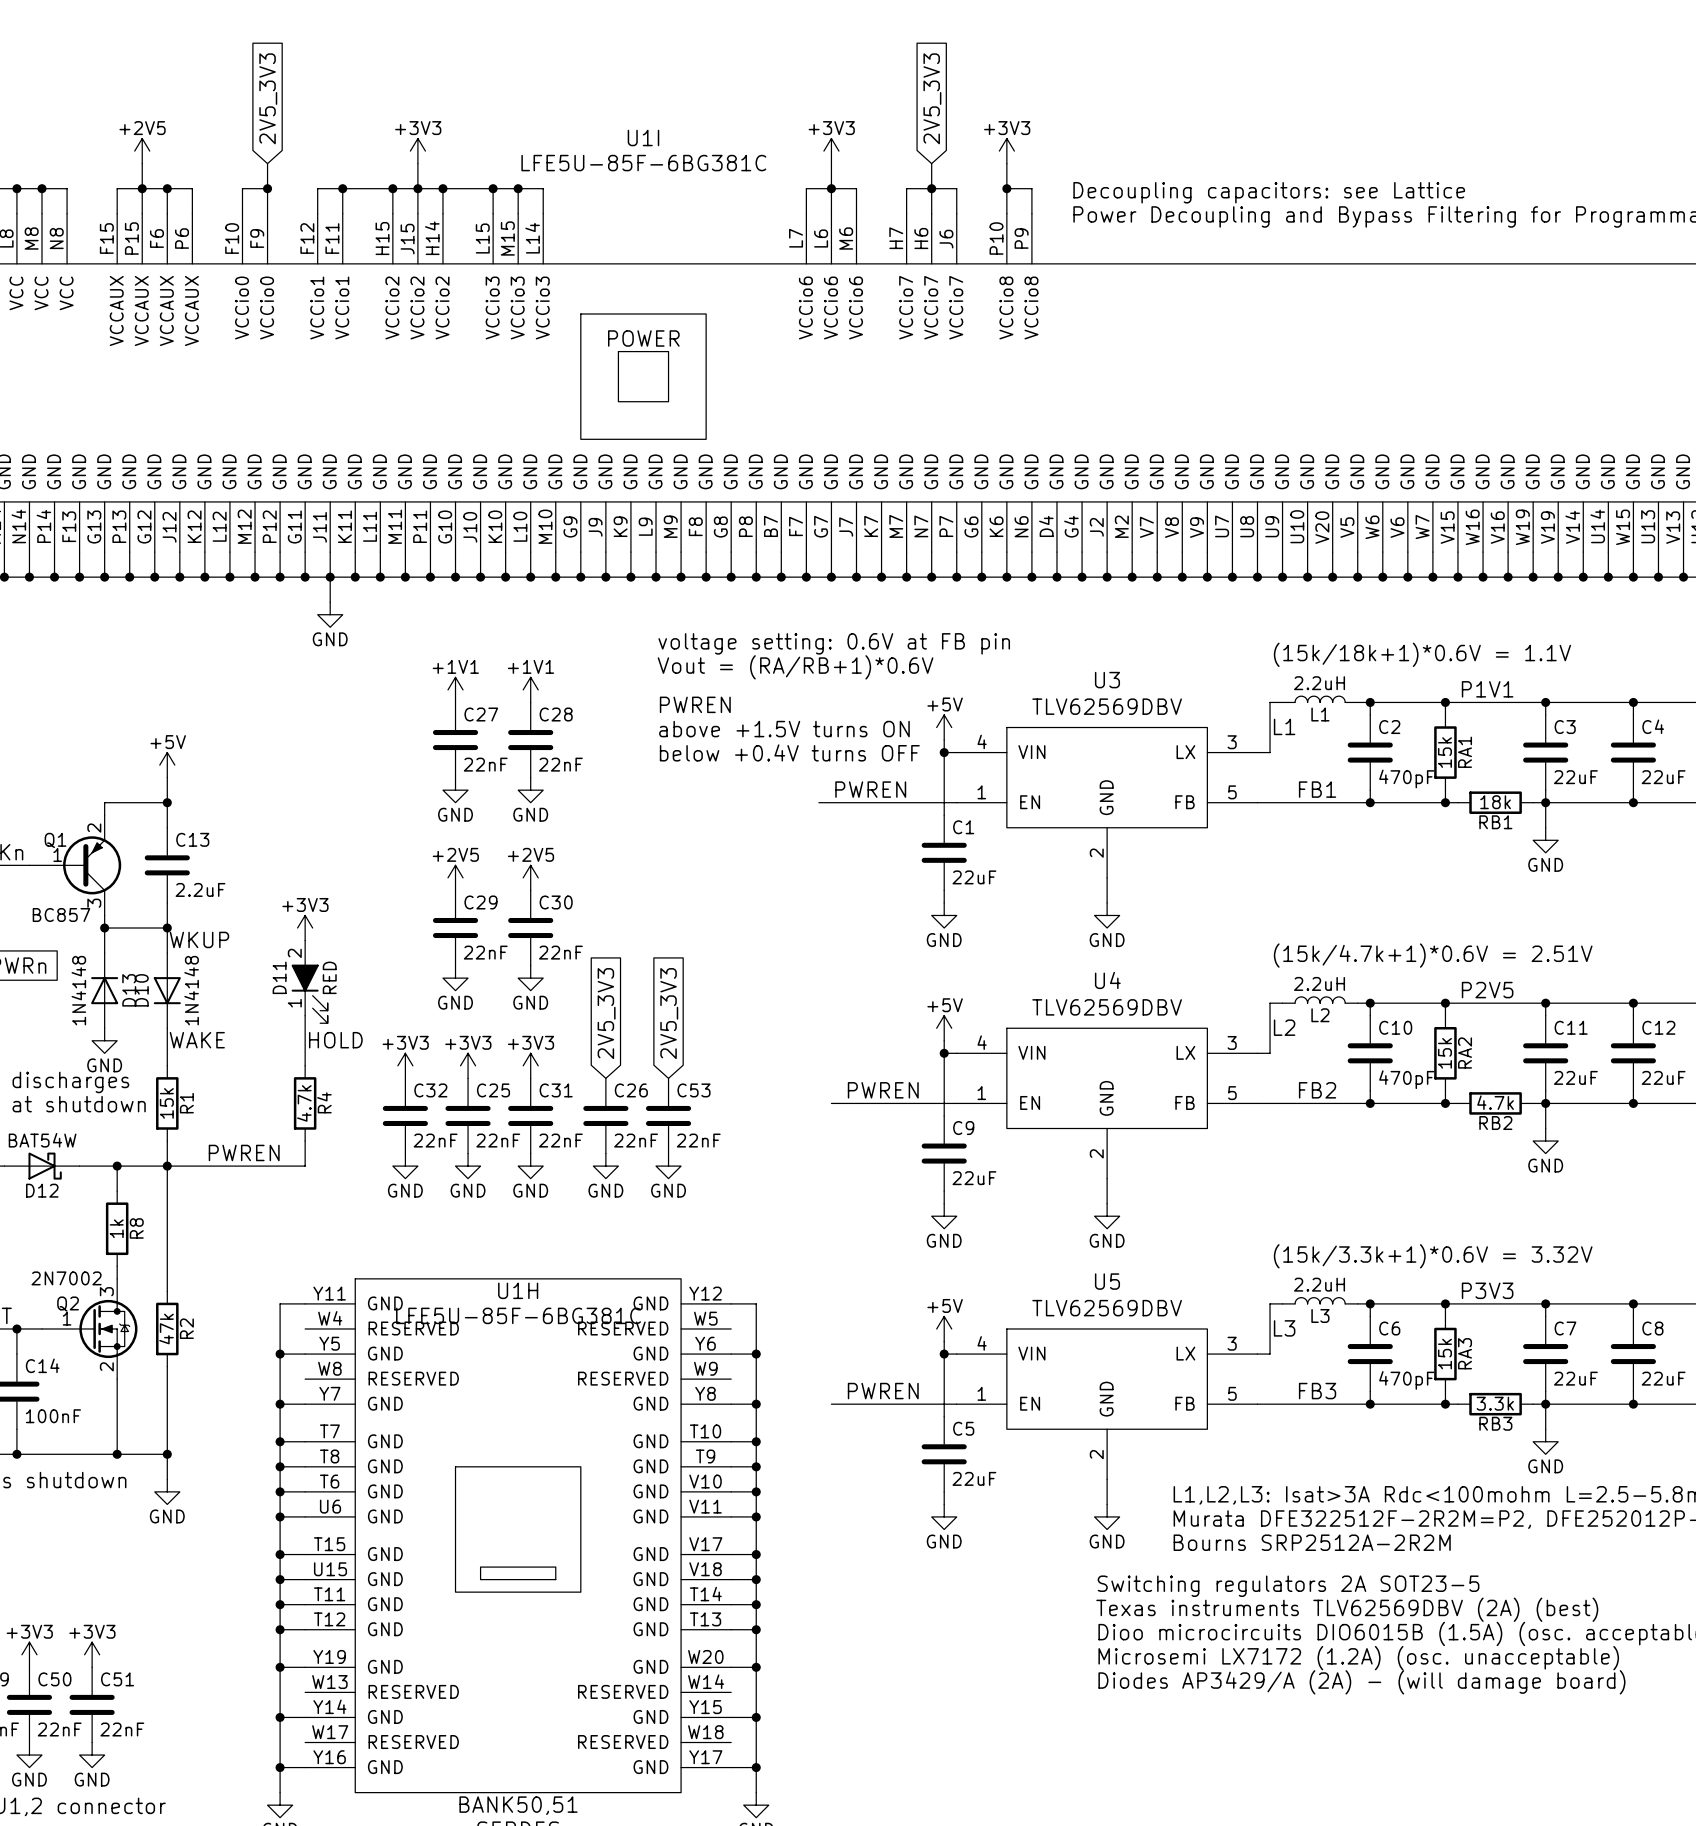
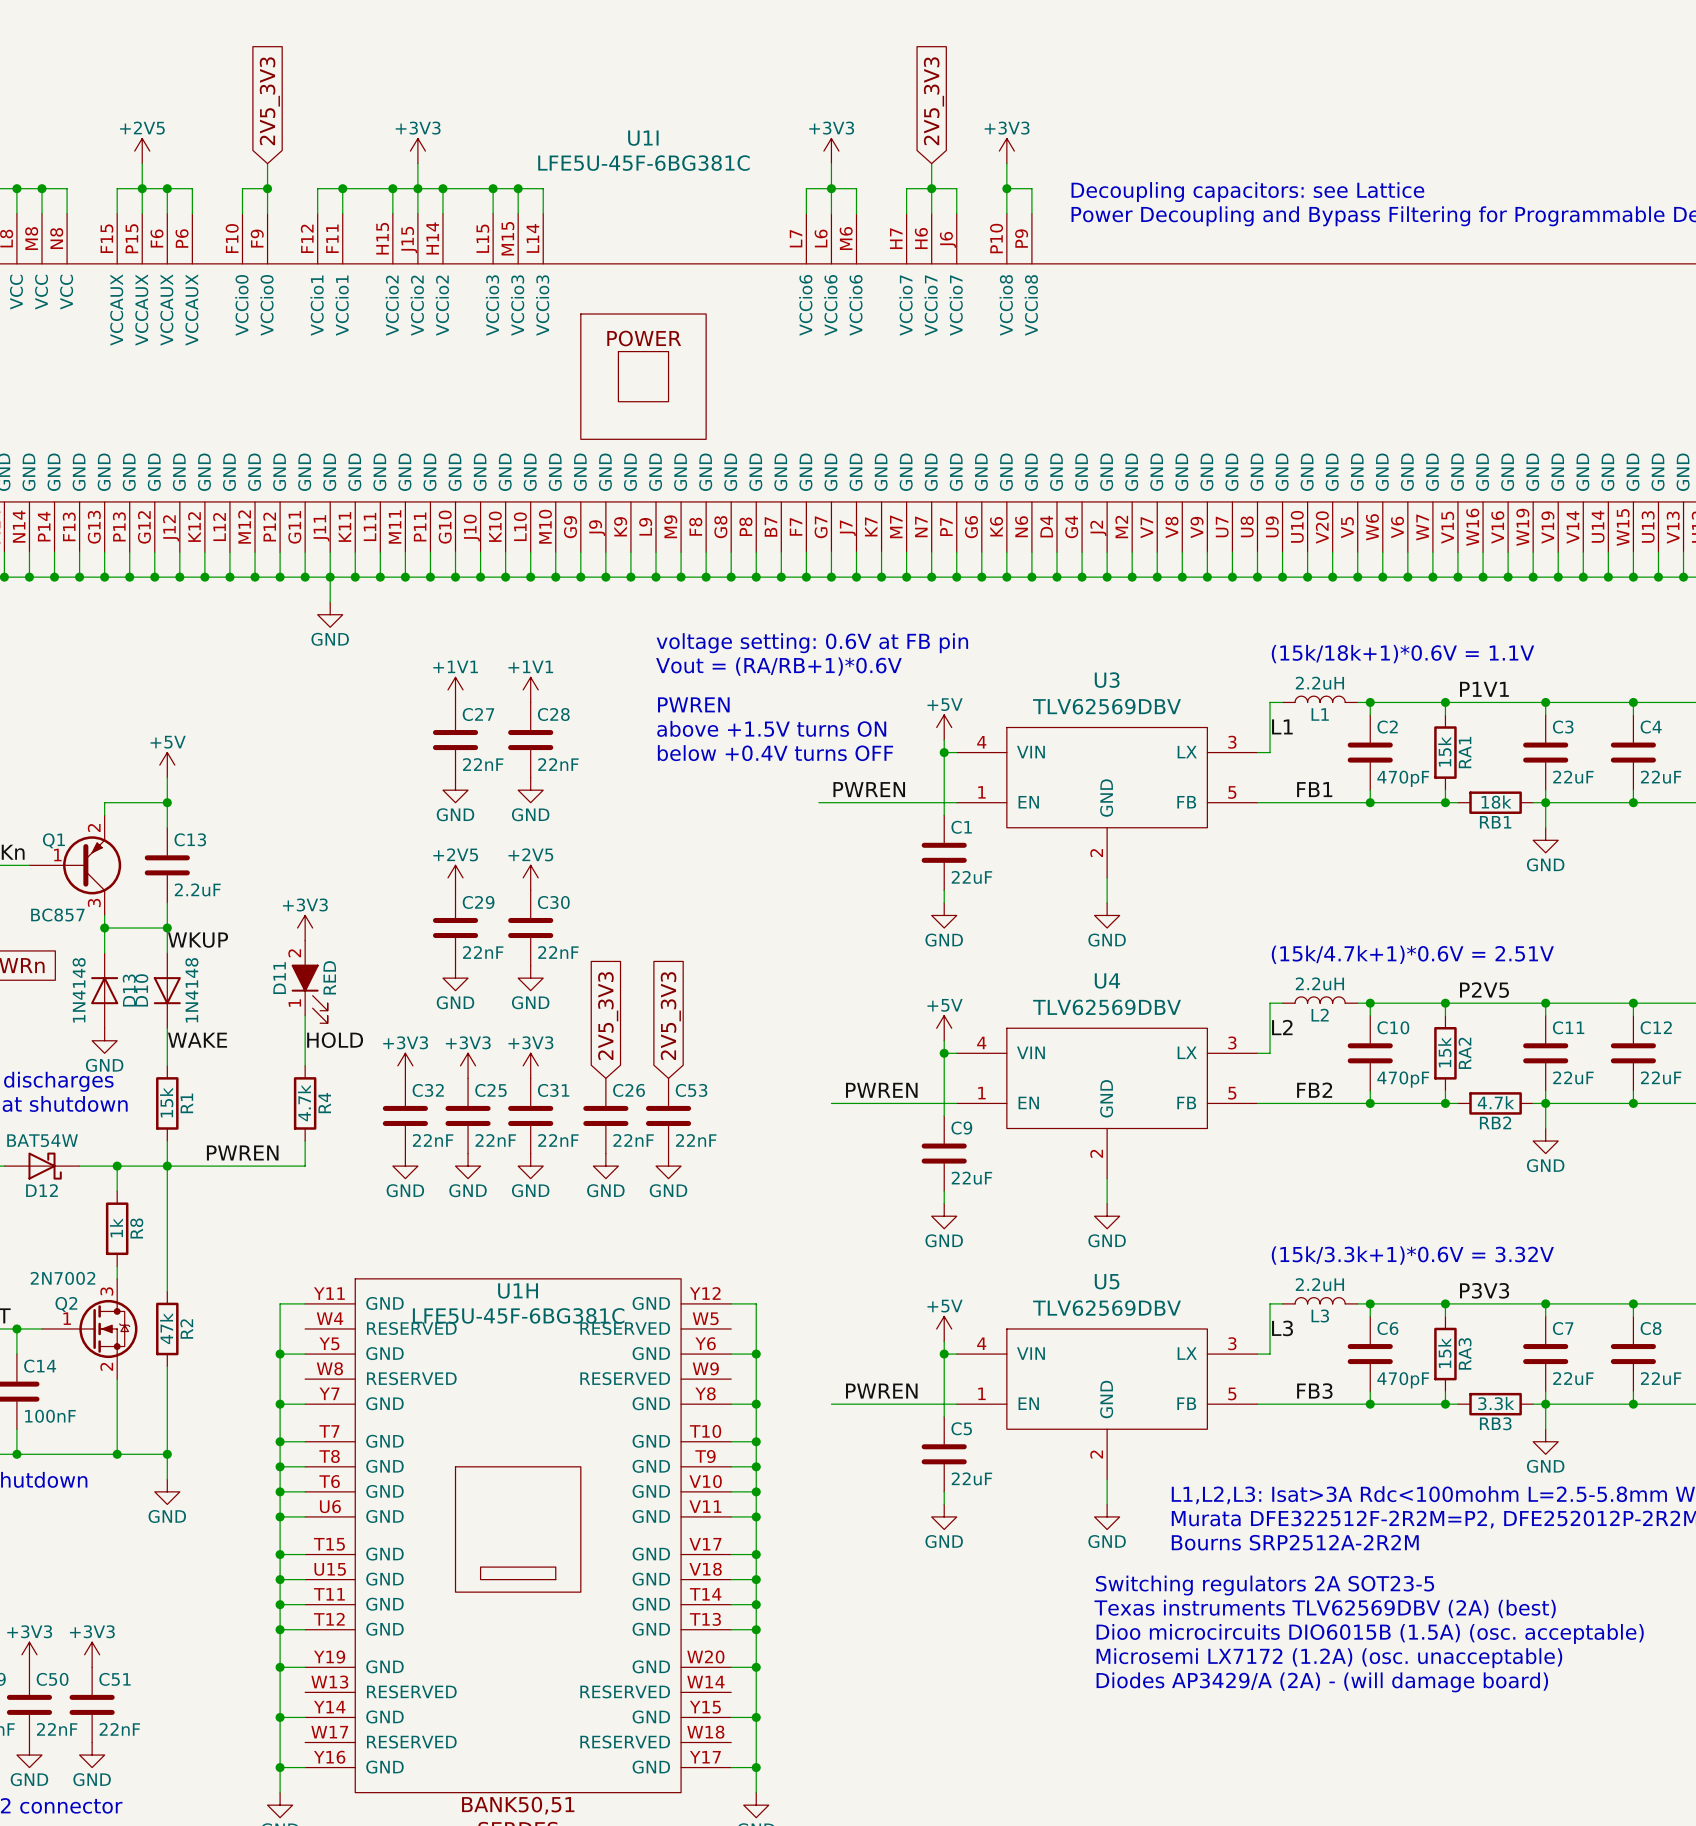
U1I value: LFE5U-85F-6BG381C (643, 163) -> LFE5U-45F-6BG381C (643, 163)
U1H value: LFE5U-85F-6BG381C (518, 1315) -> LFE5U-45F-6BG381C (518, 1315)

